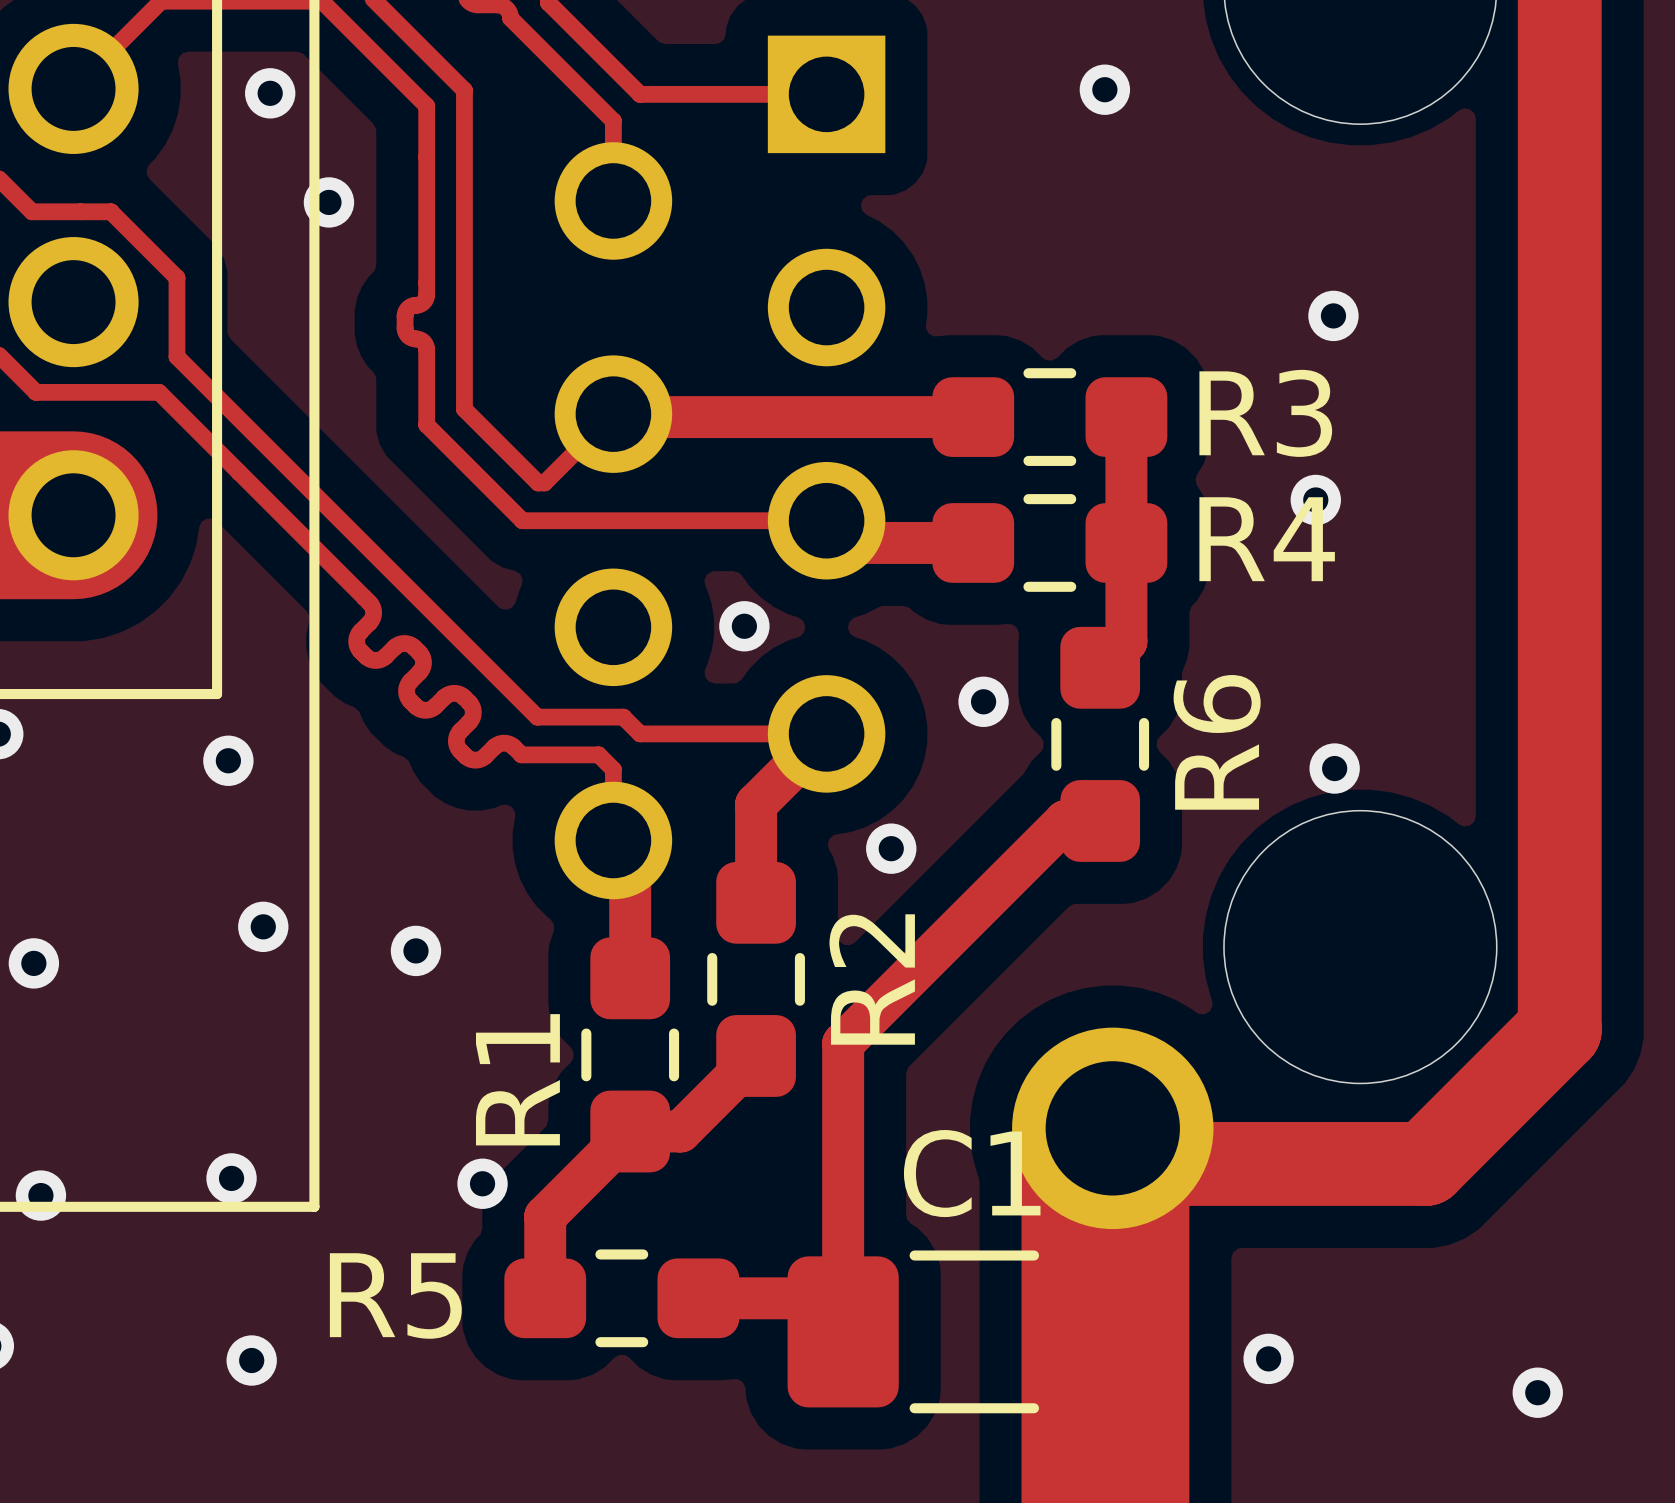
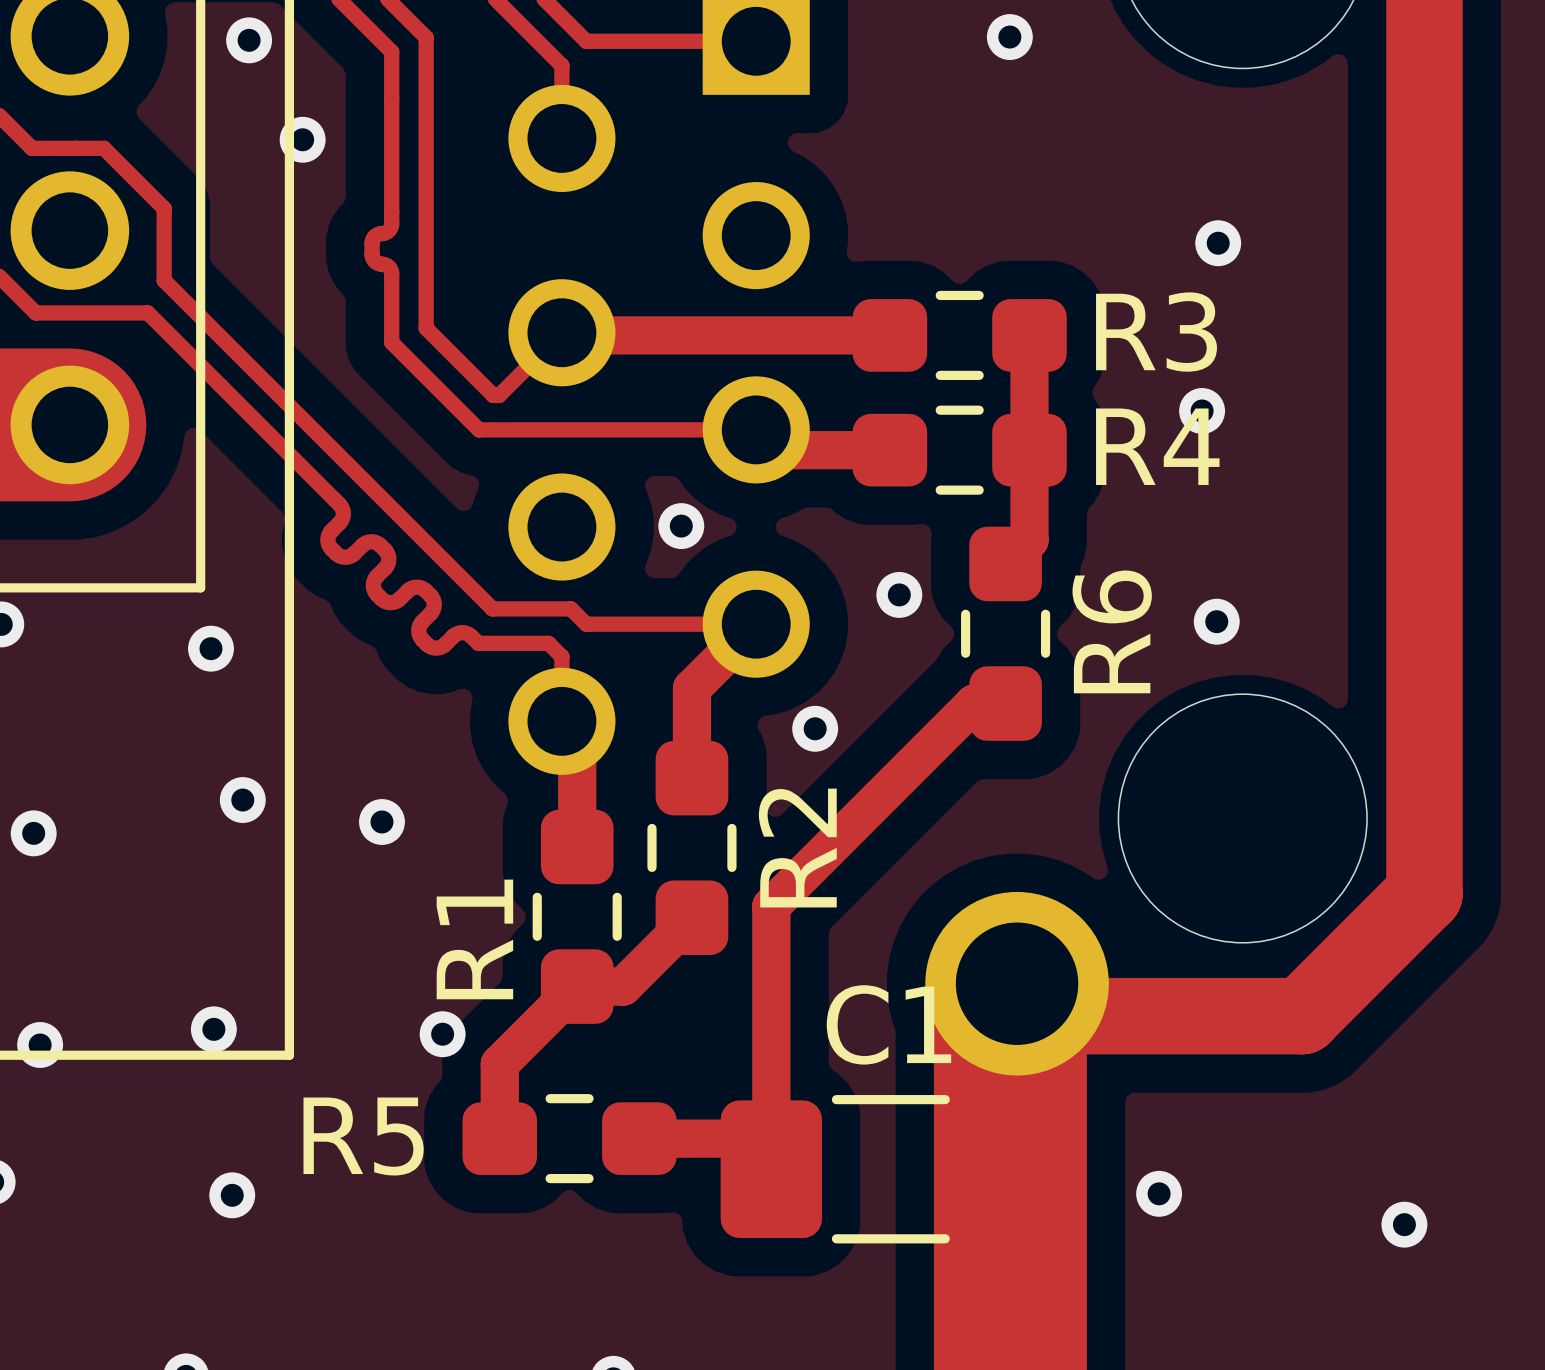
via position: (1334, 768) -> (1216, 621)

